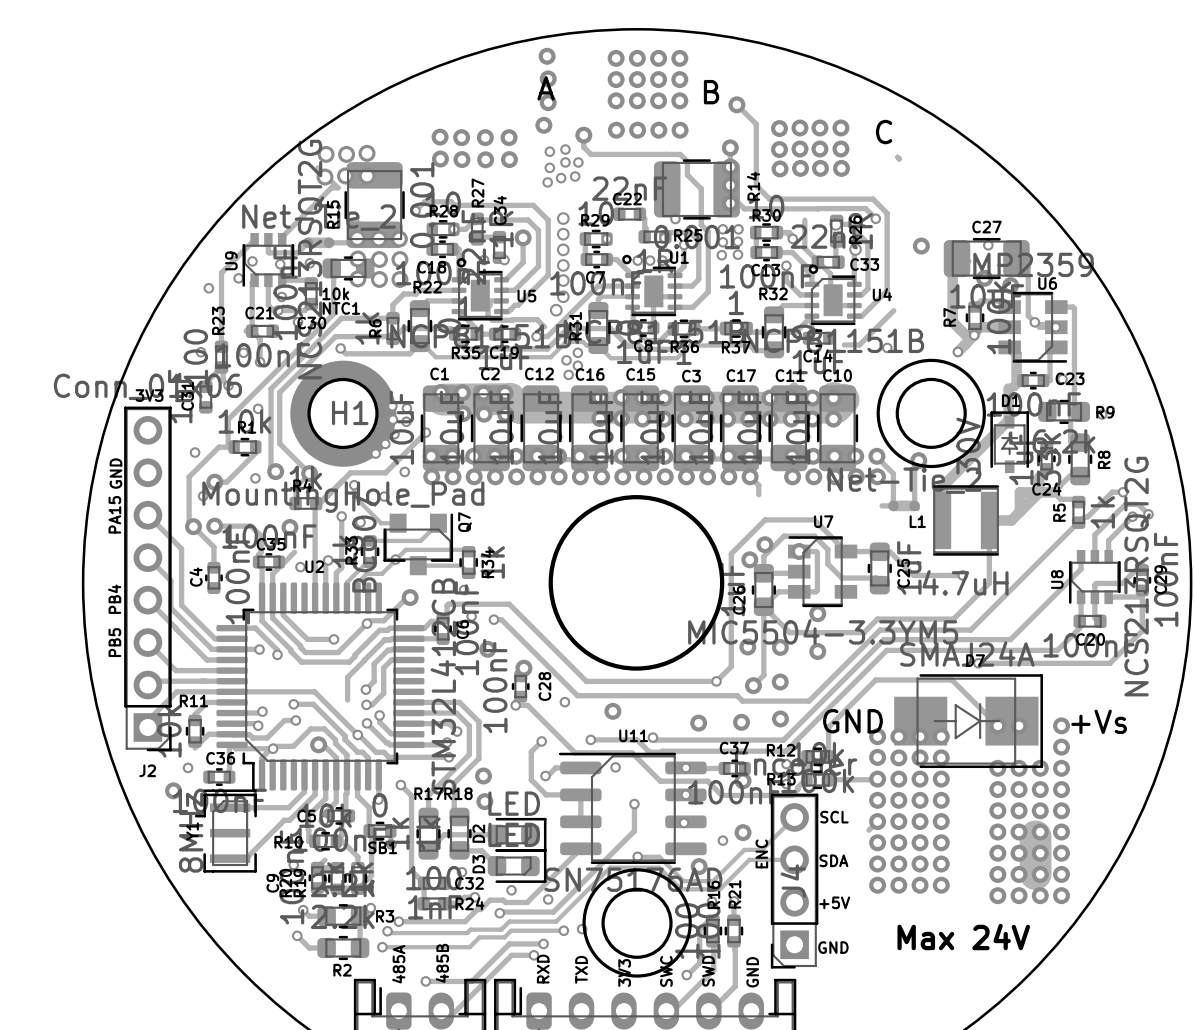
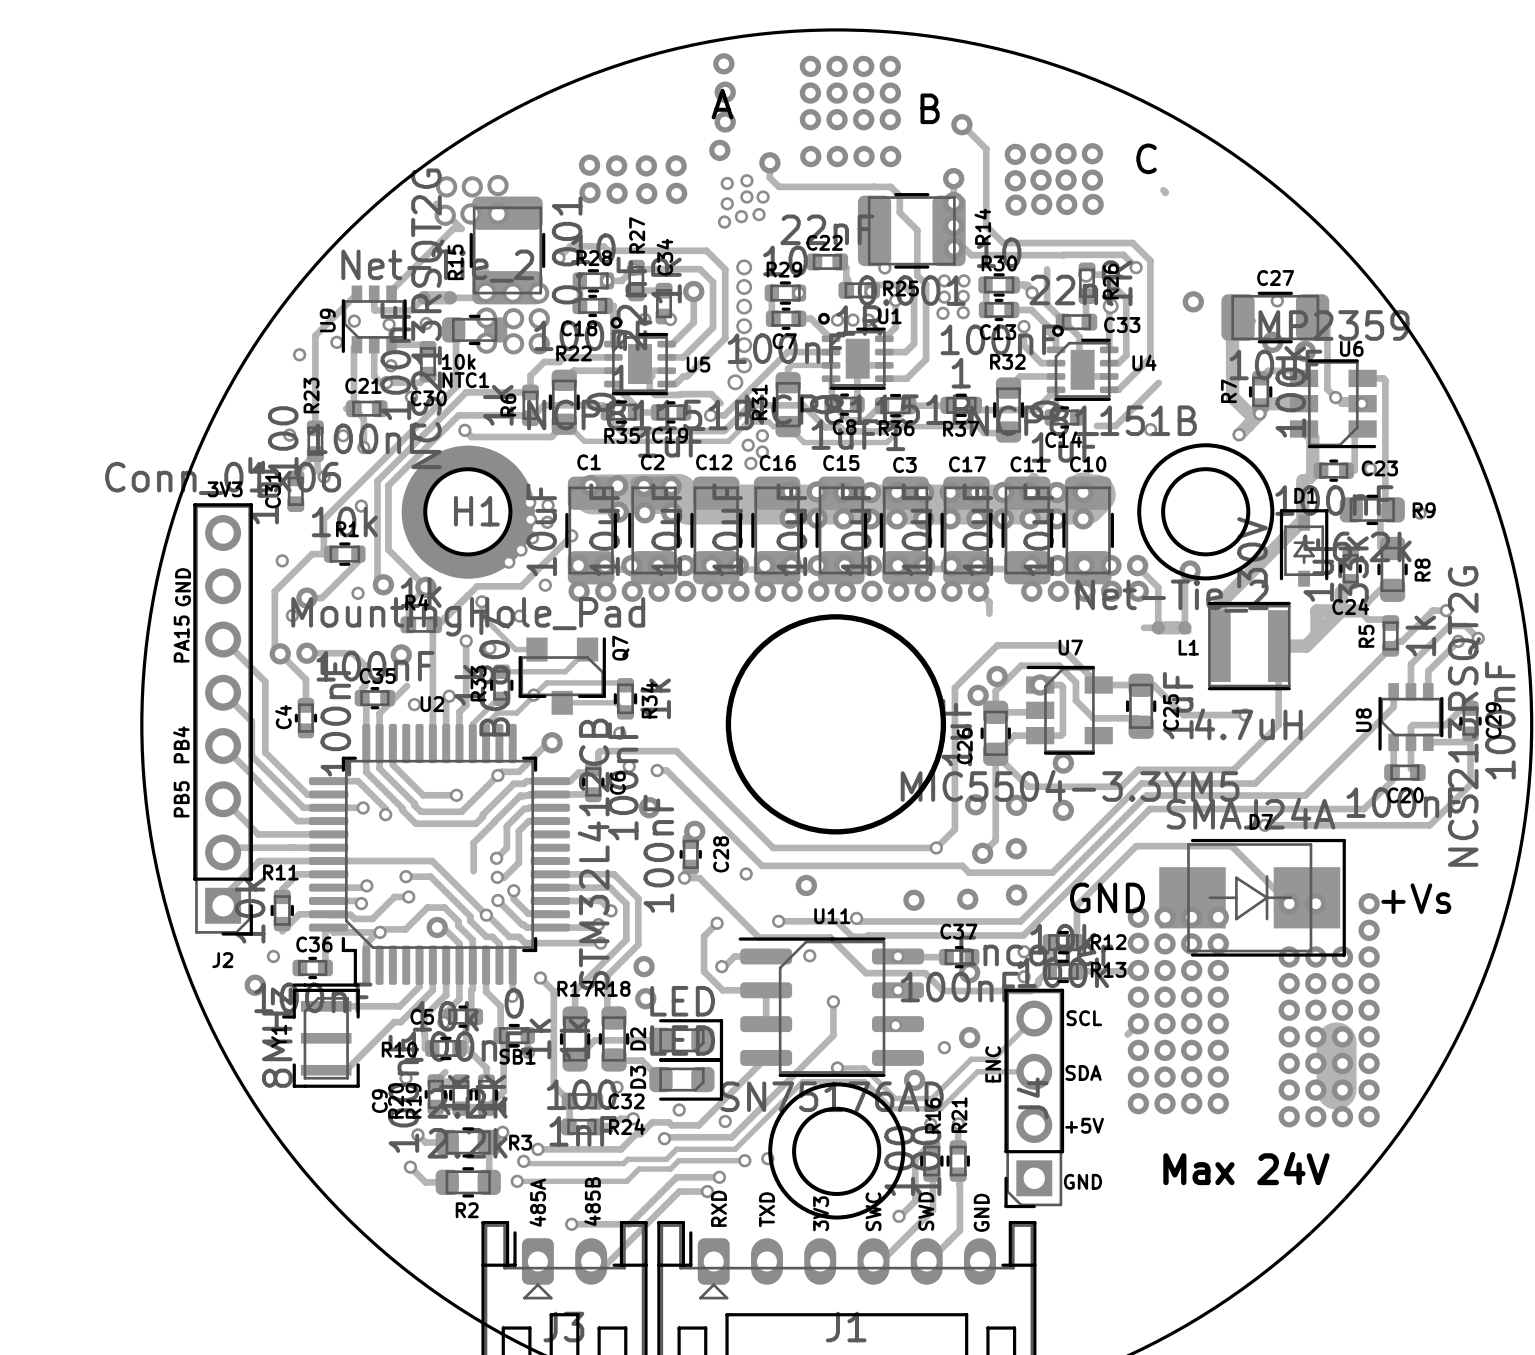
R12 name position: R12 (781, 750) -> R12 (1108, 942)
R13 name position: R13 (781, 779) -> R13 (1108, 969)

